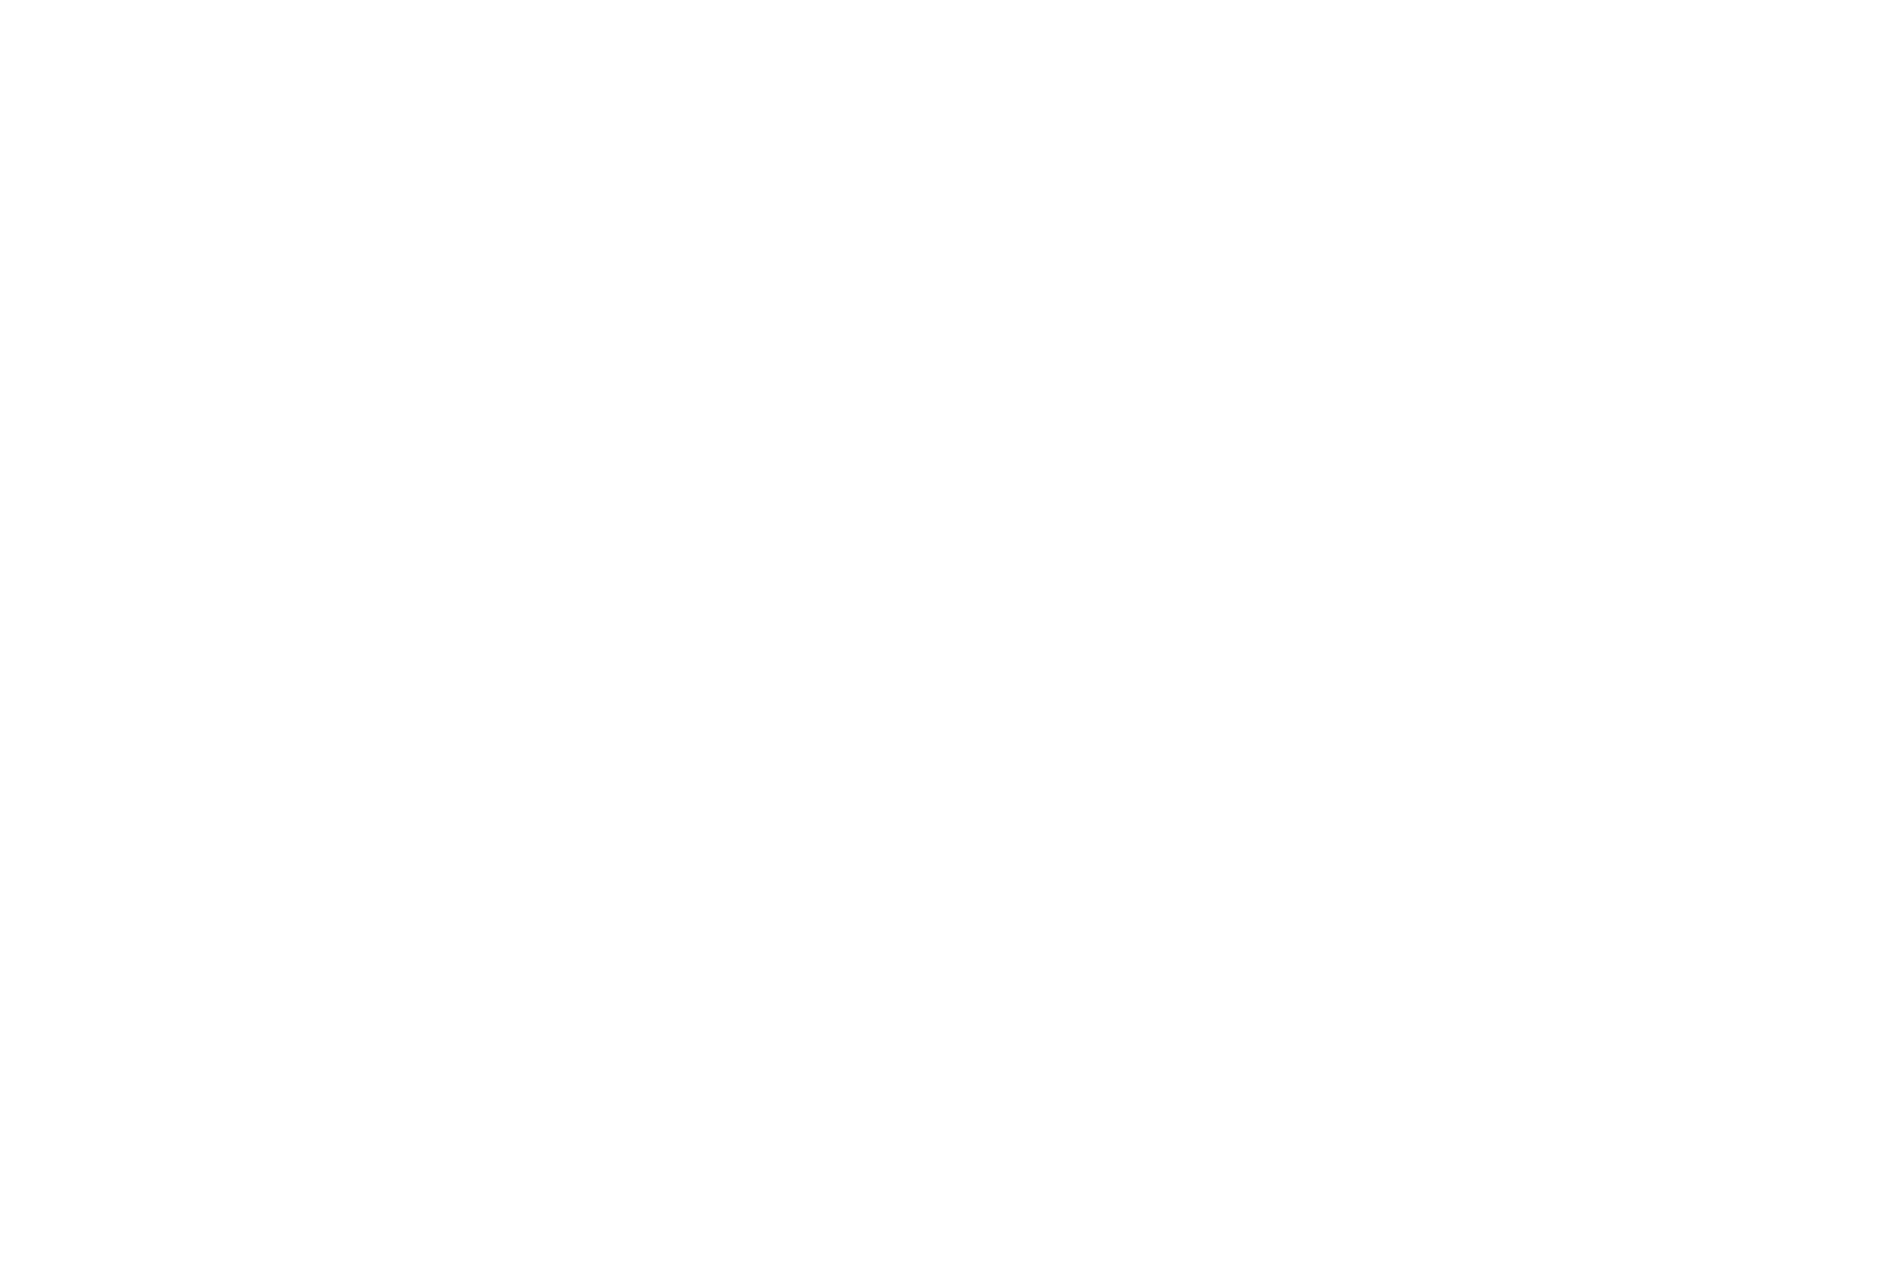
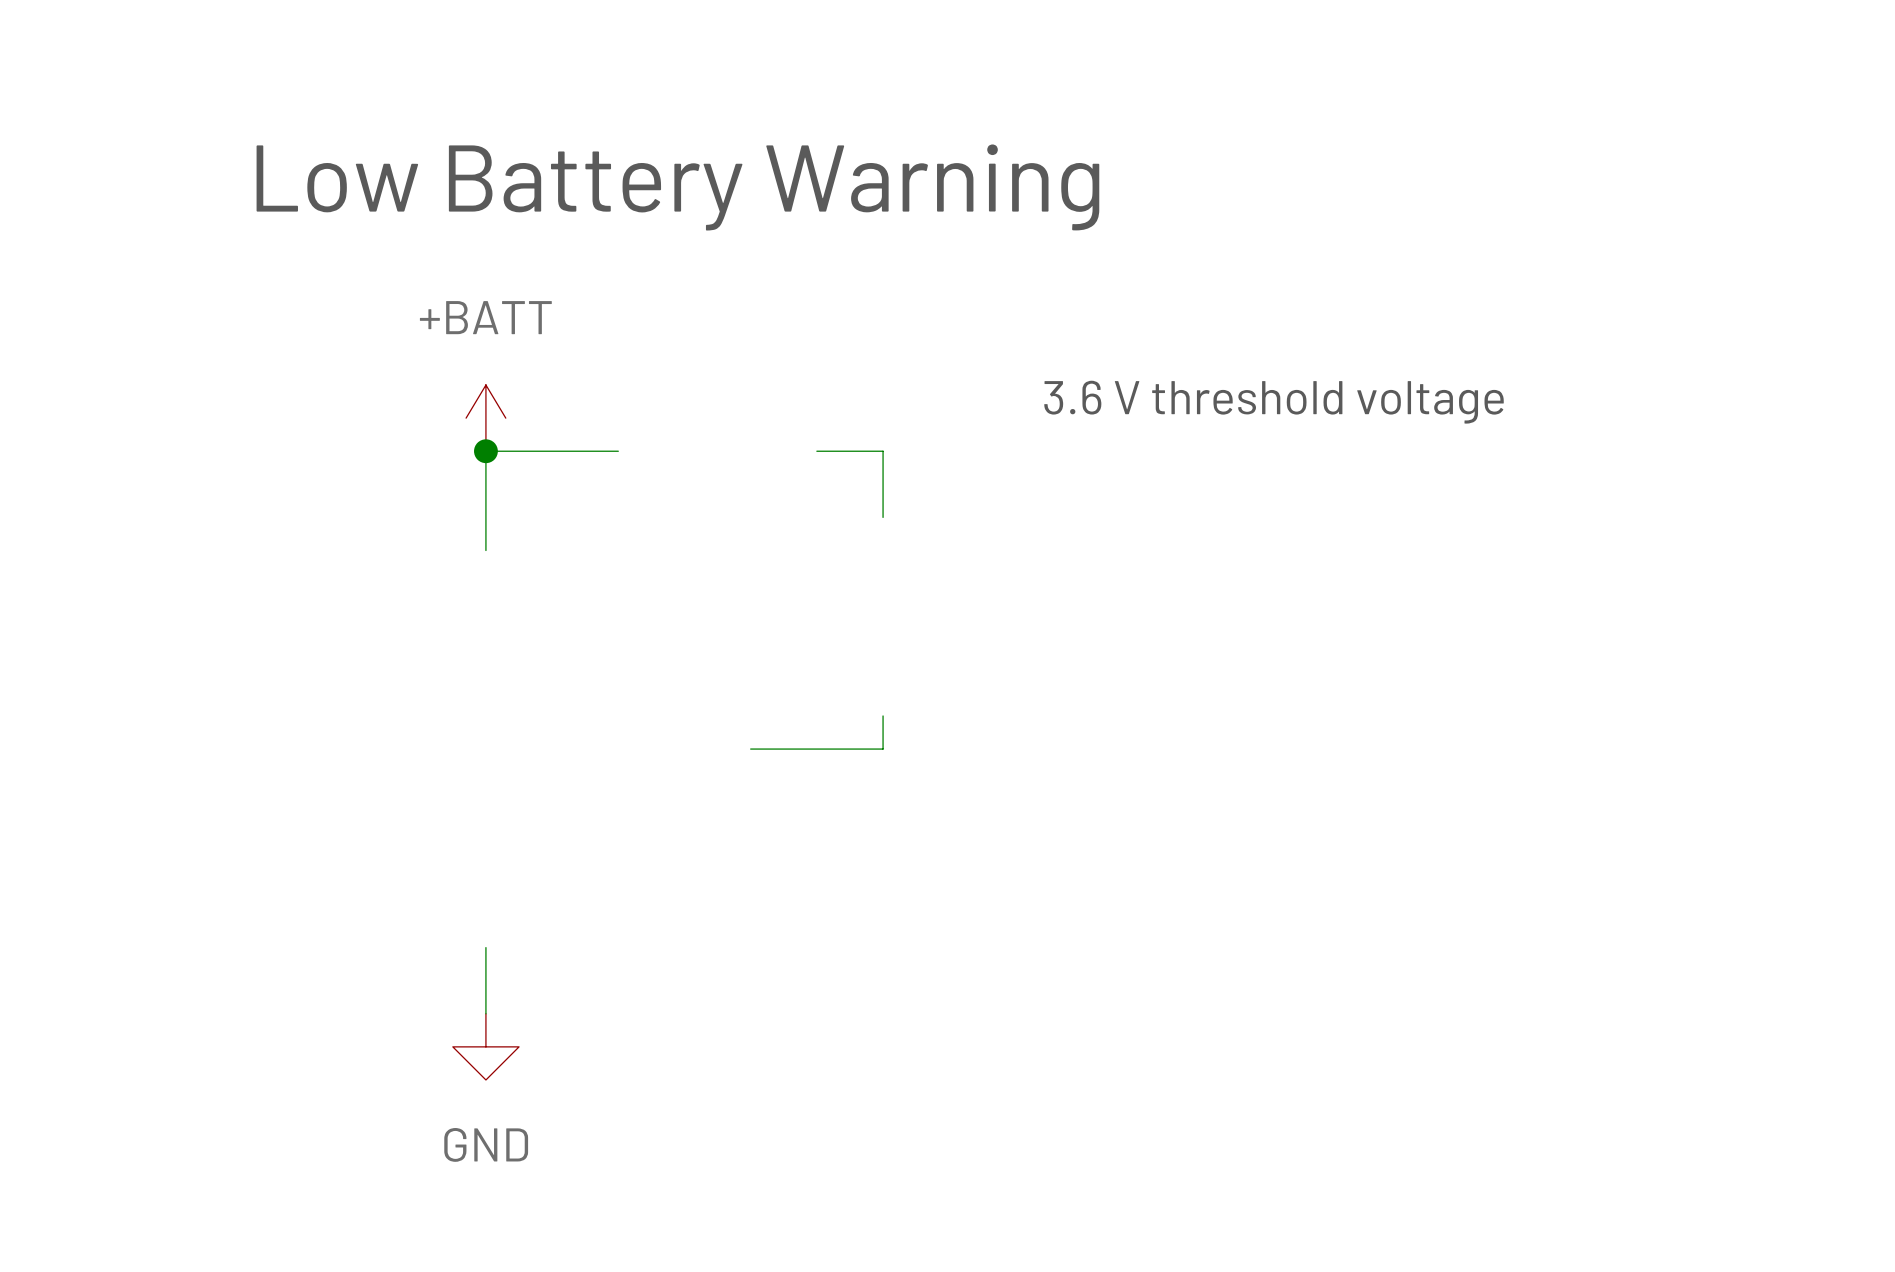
text: none -> Low Battery Warning (677, 187)
text: none -> 3.6 V threshold voltage (1274, 402)
power symbol: none -> +BATT (485, 418)
junction: none -> (485, 451)
wire: none -> (618, 451) (485, 451) (485, 550)
wire: none -> (816, 451) (883, 451) (883, 517)
wire: none -> (883, 715) (883, 749) (750, 749)
wire: none -> (485, 947) (485, 1013)
power symbol: none -> GND (485, 1046)

